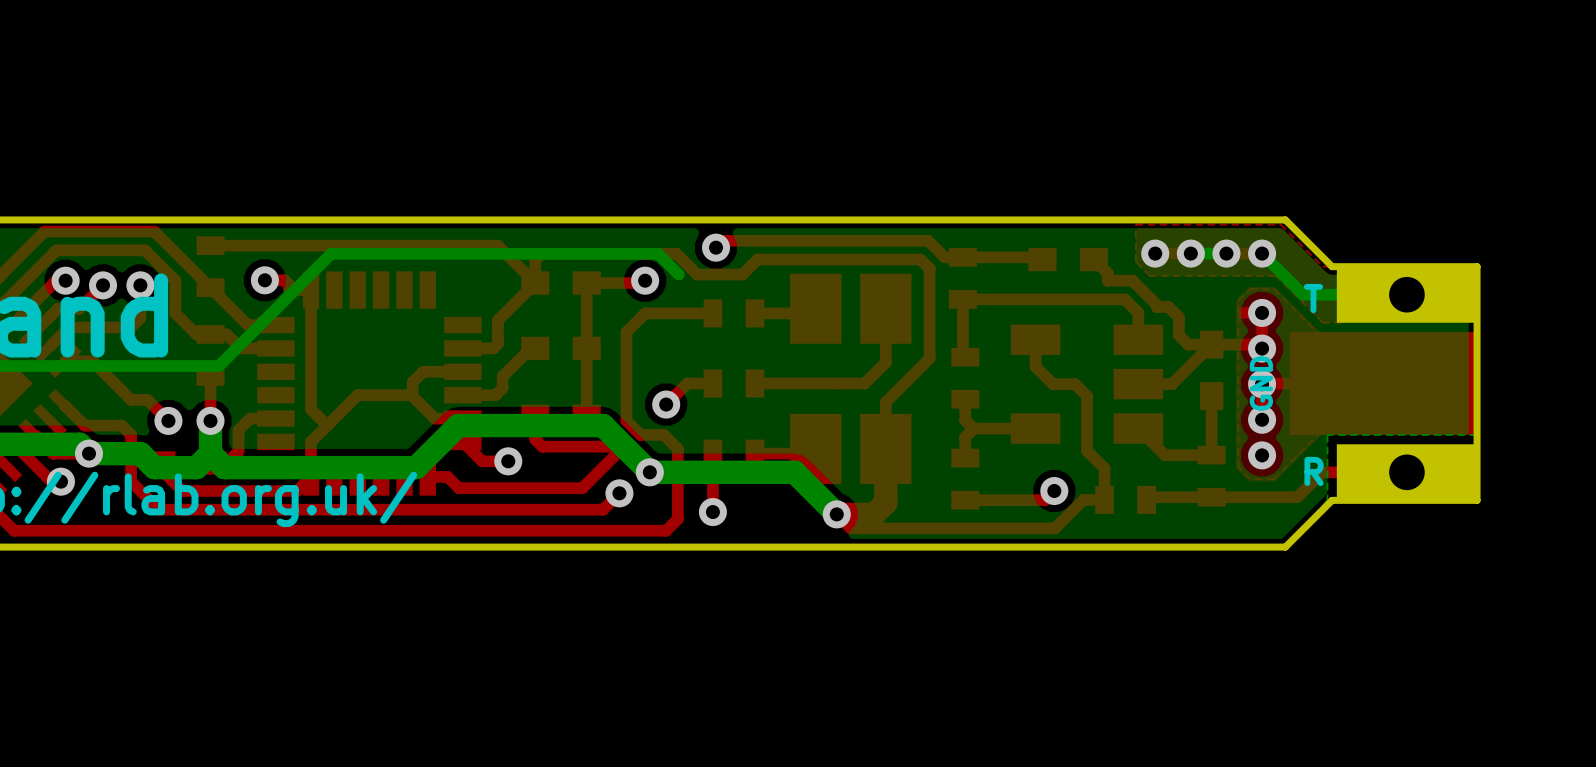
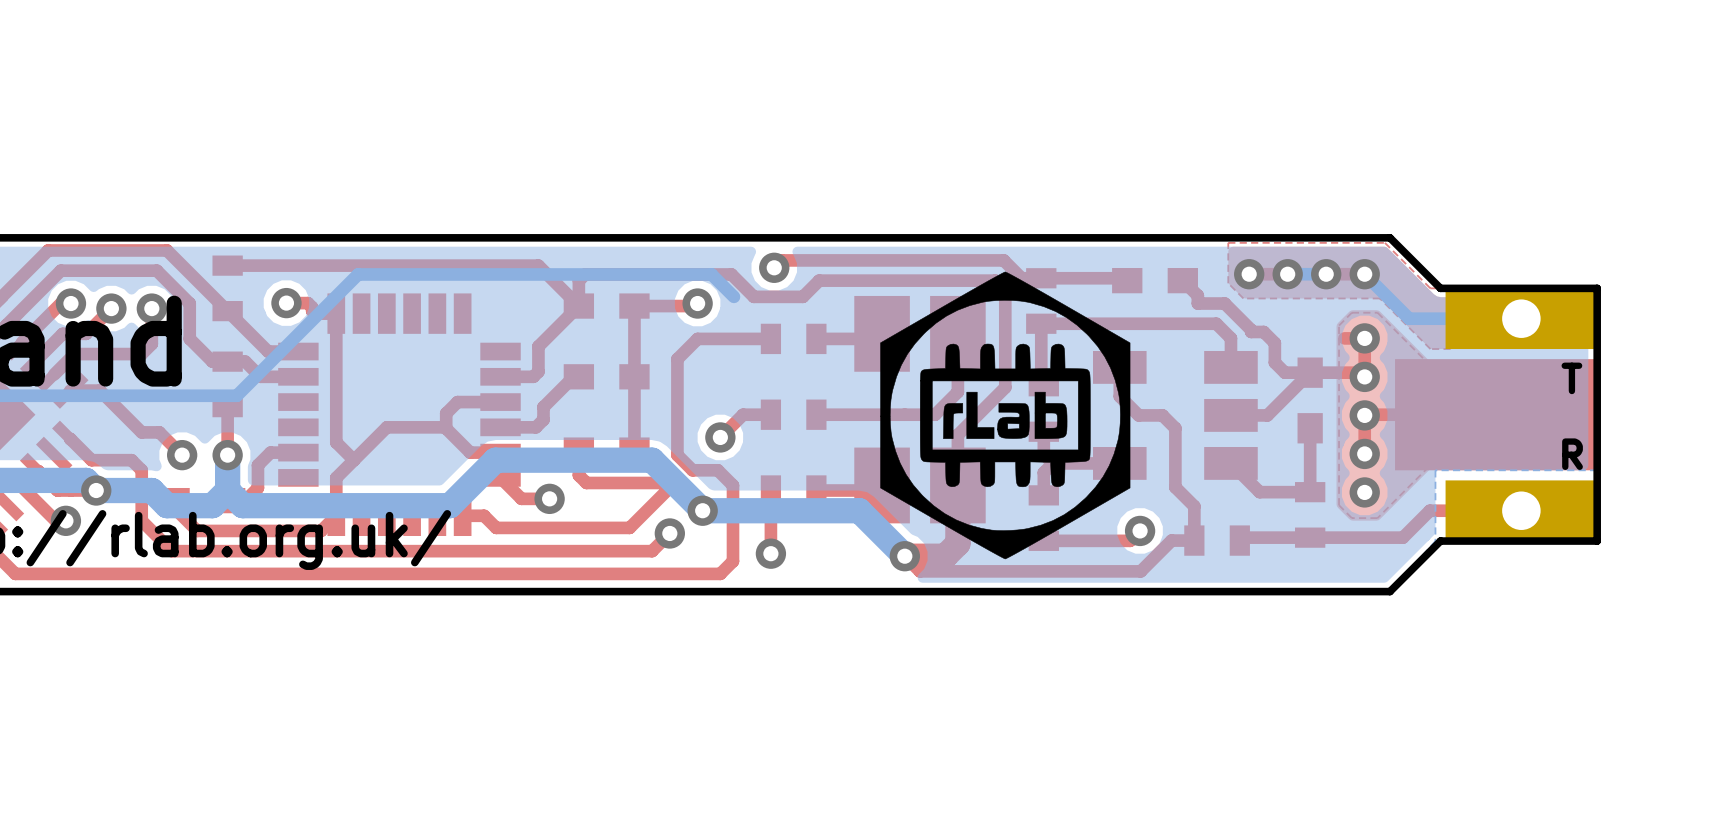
drawing: none -> [880, 271, 1131, 560]
text position: T (1313, 298) -> T (1571, 378)
text: GND (1261, 383) -> none
text position: R (1314, 471) -> R (1572, 454)

